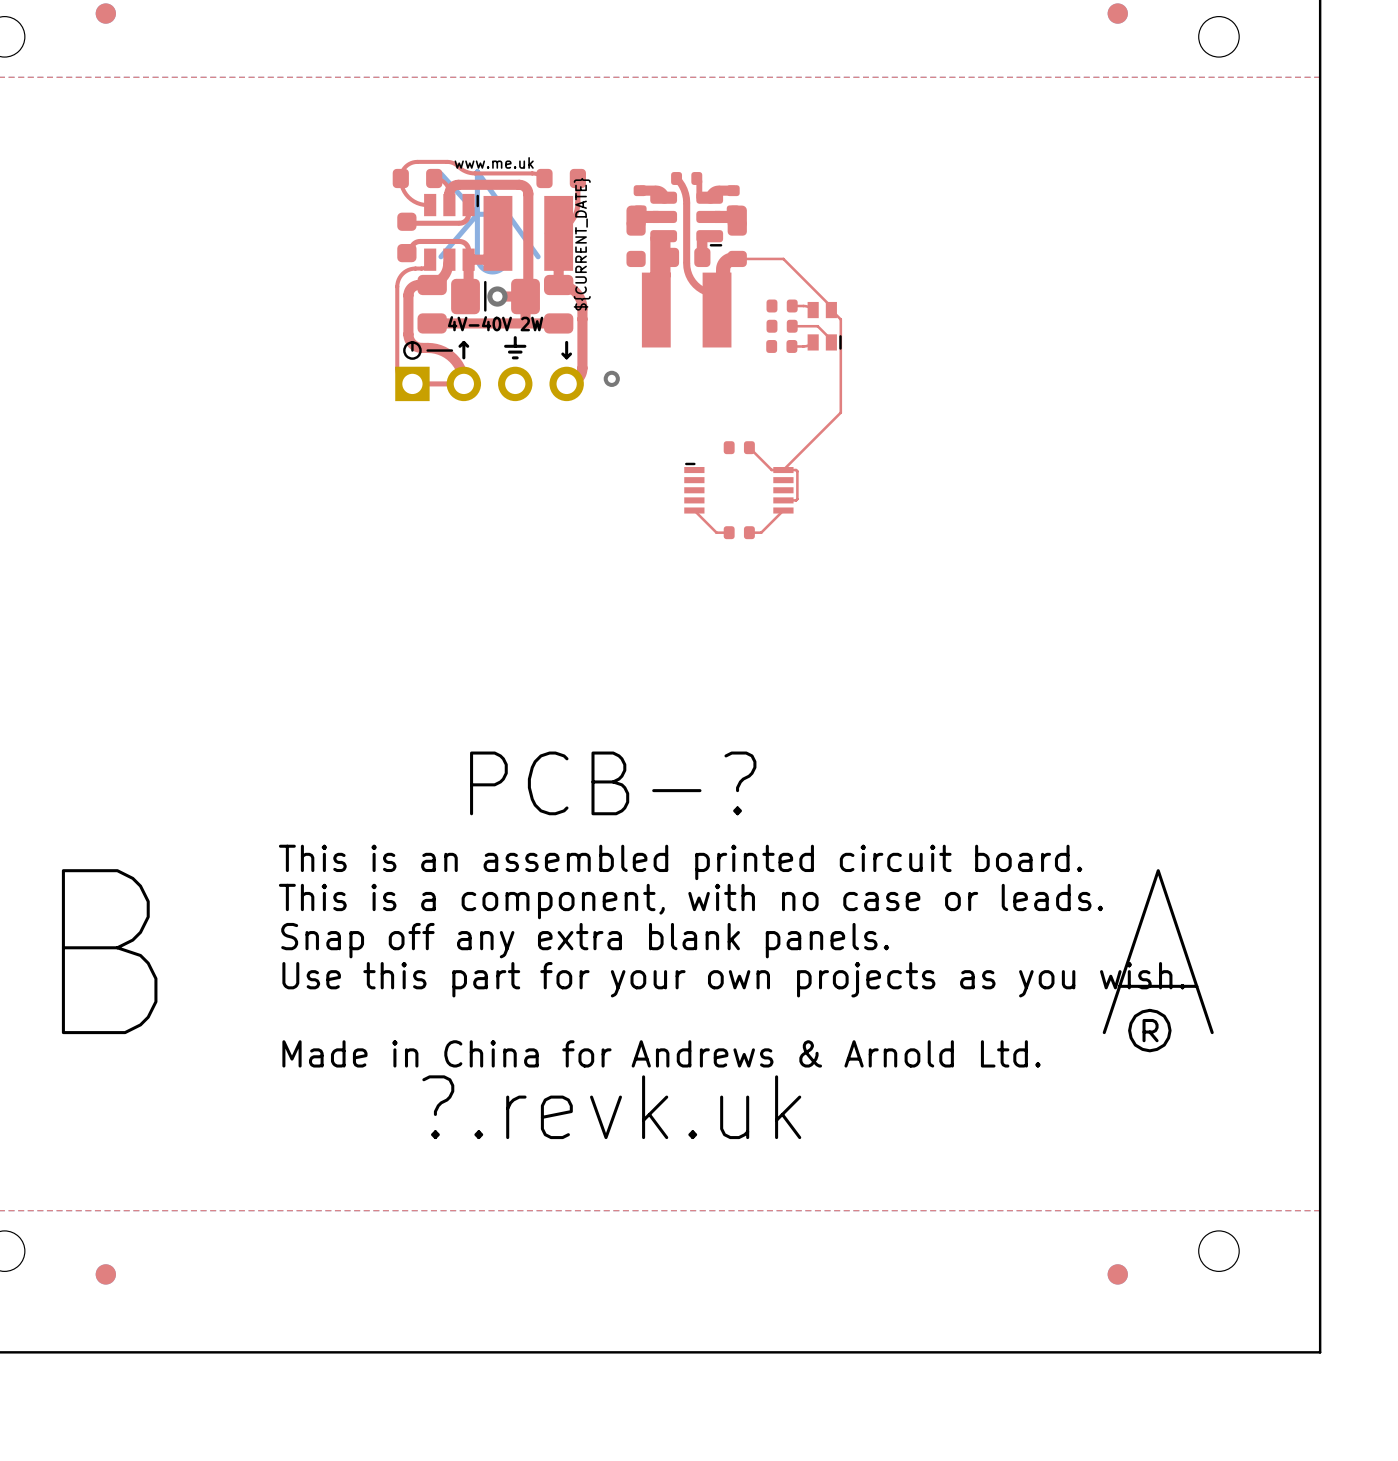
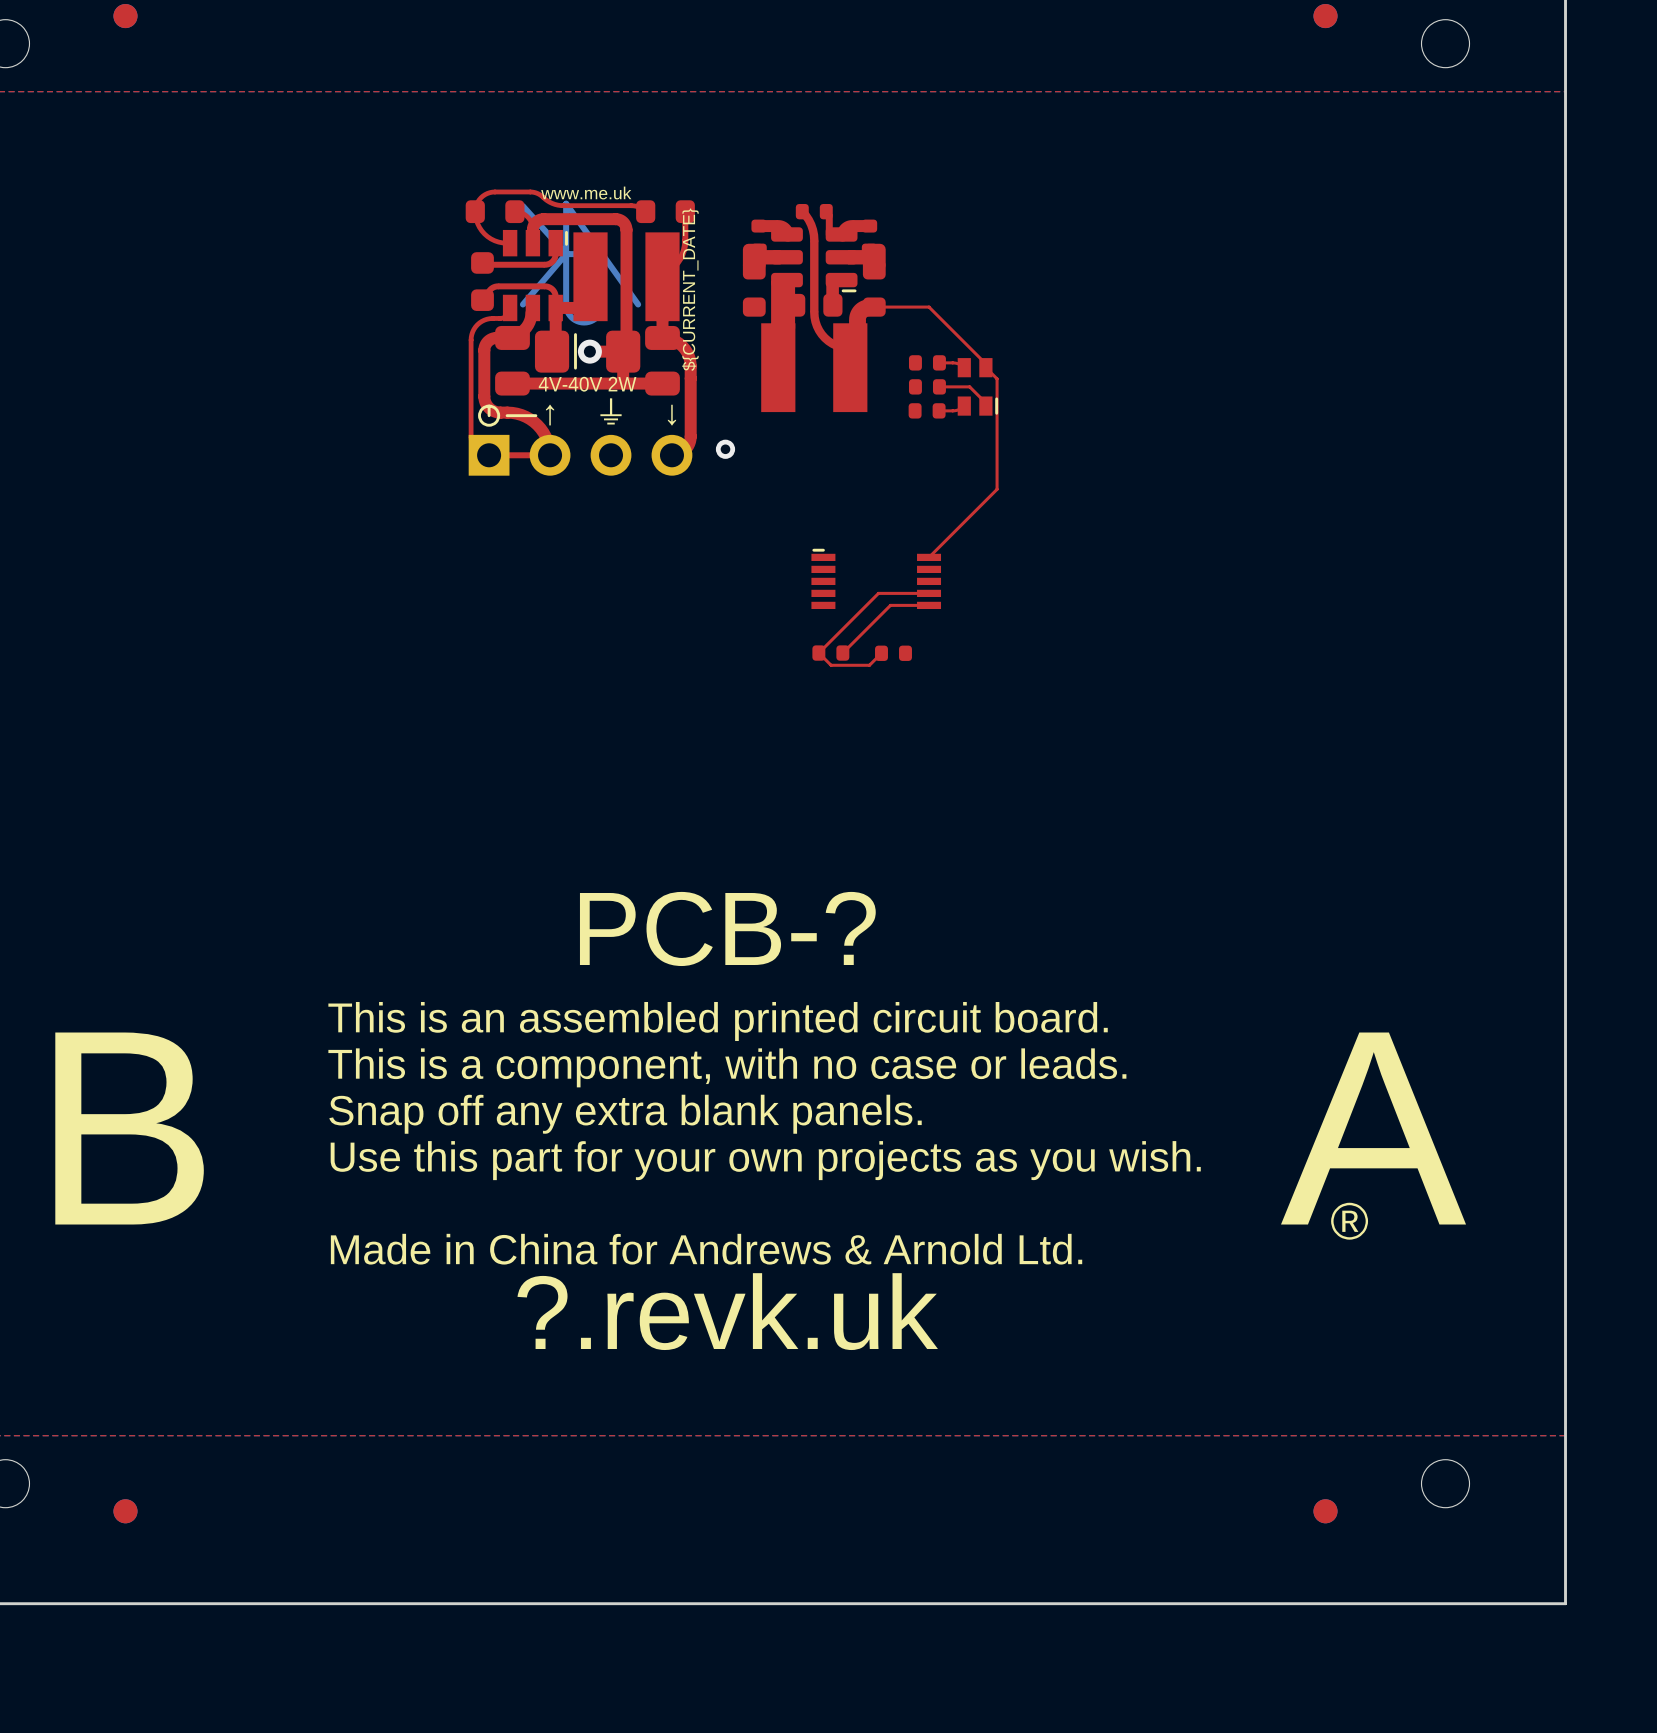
part: (739, 447) -> none
top track: (749, 447) (771, 470) (797, 471) (797, 499) (783, 500) -> (881, 653) (869, 665) (831, 665) (818, 653) (878, 593) (929, 593)
top track: (694, 510) (716, 532) (729, 532) -> none
top track: (783, 510) (761, 532) (749, 532) -> (929, 605) (890, 605) (842, 653)
part: (739, 532) -> none
part: none -> (830, 653)
part: none -> (893, 653)

